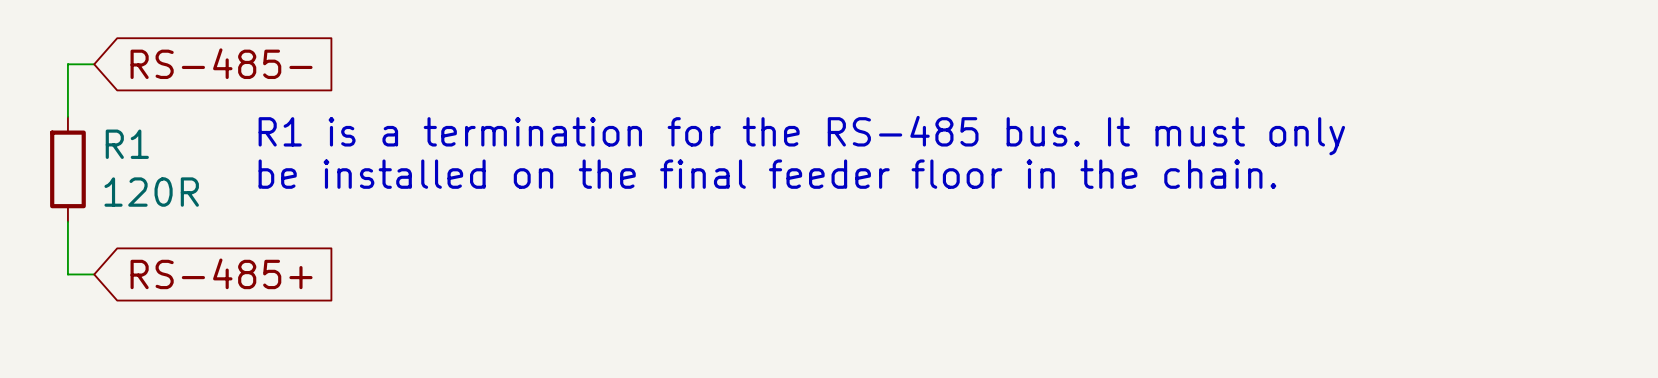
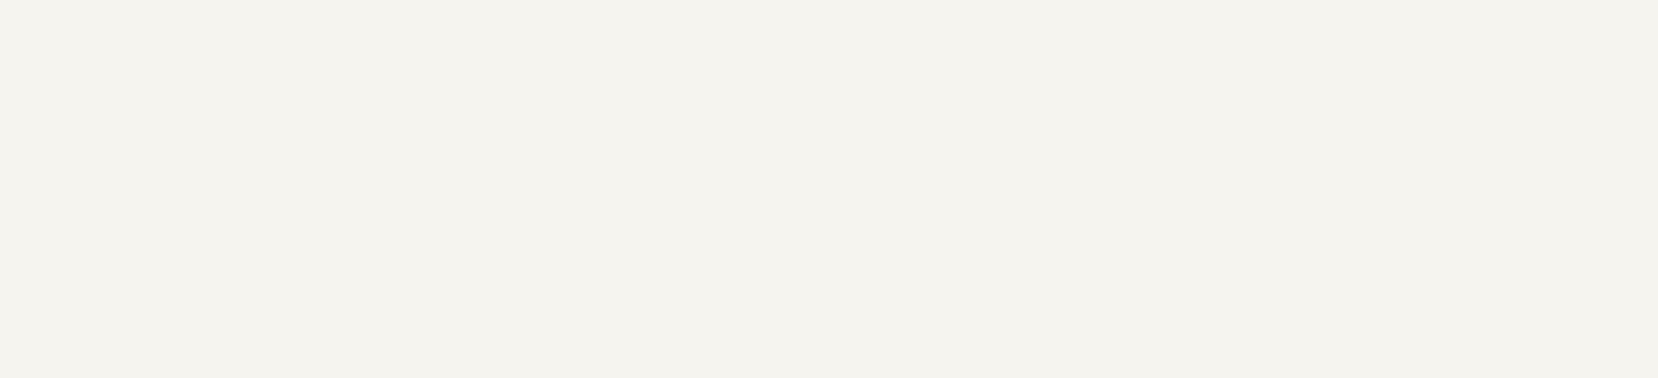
global label: RS-485- (221, 63) -> none
wire: (94, 64) (67, 64) (67, 116) -> none
text: R1 is a termination for the RS-485 bus. It must only (801, 135) -> none
R1: 120R (67, 169) -> none
text: be installed on the final feeder floor in the chain. (767, 174) -> none
wire: (67, 221) (67, 274) (94, 274) -> none
global label: RS-485+ (221, 273) -> none

